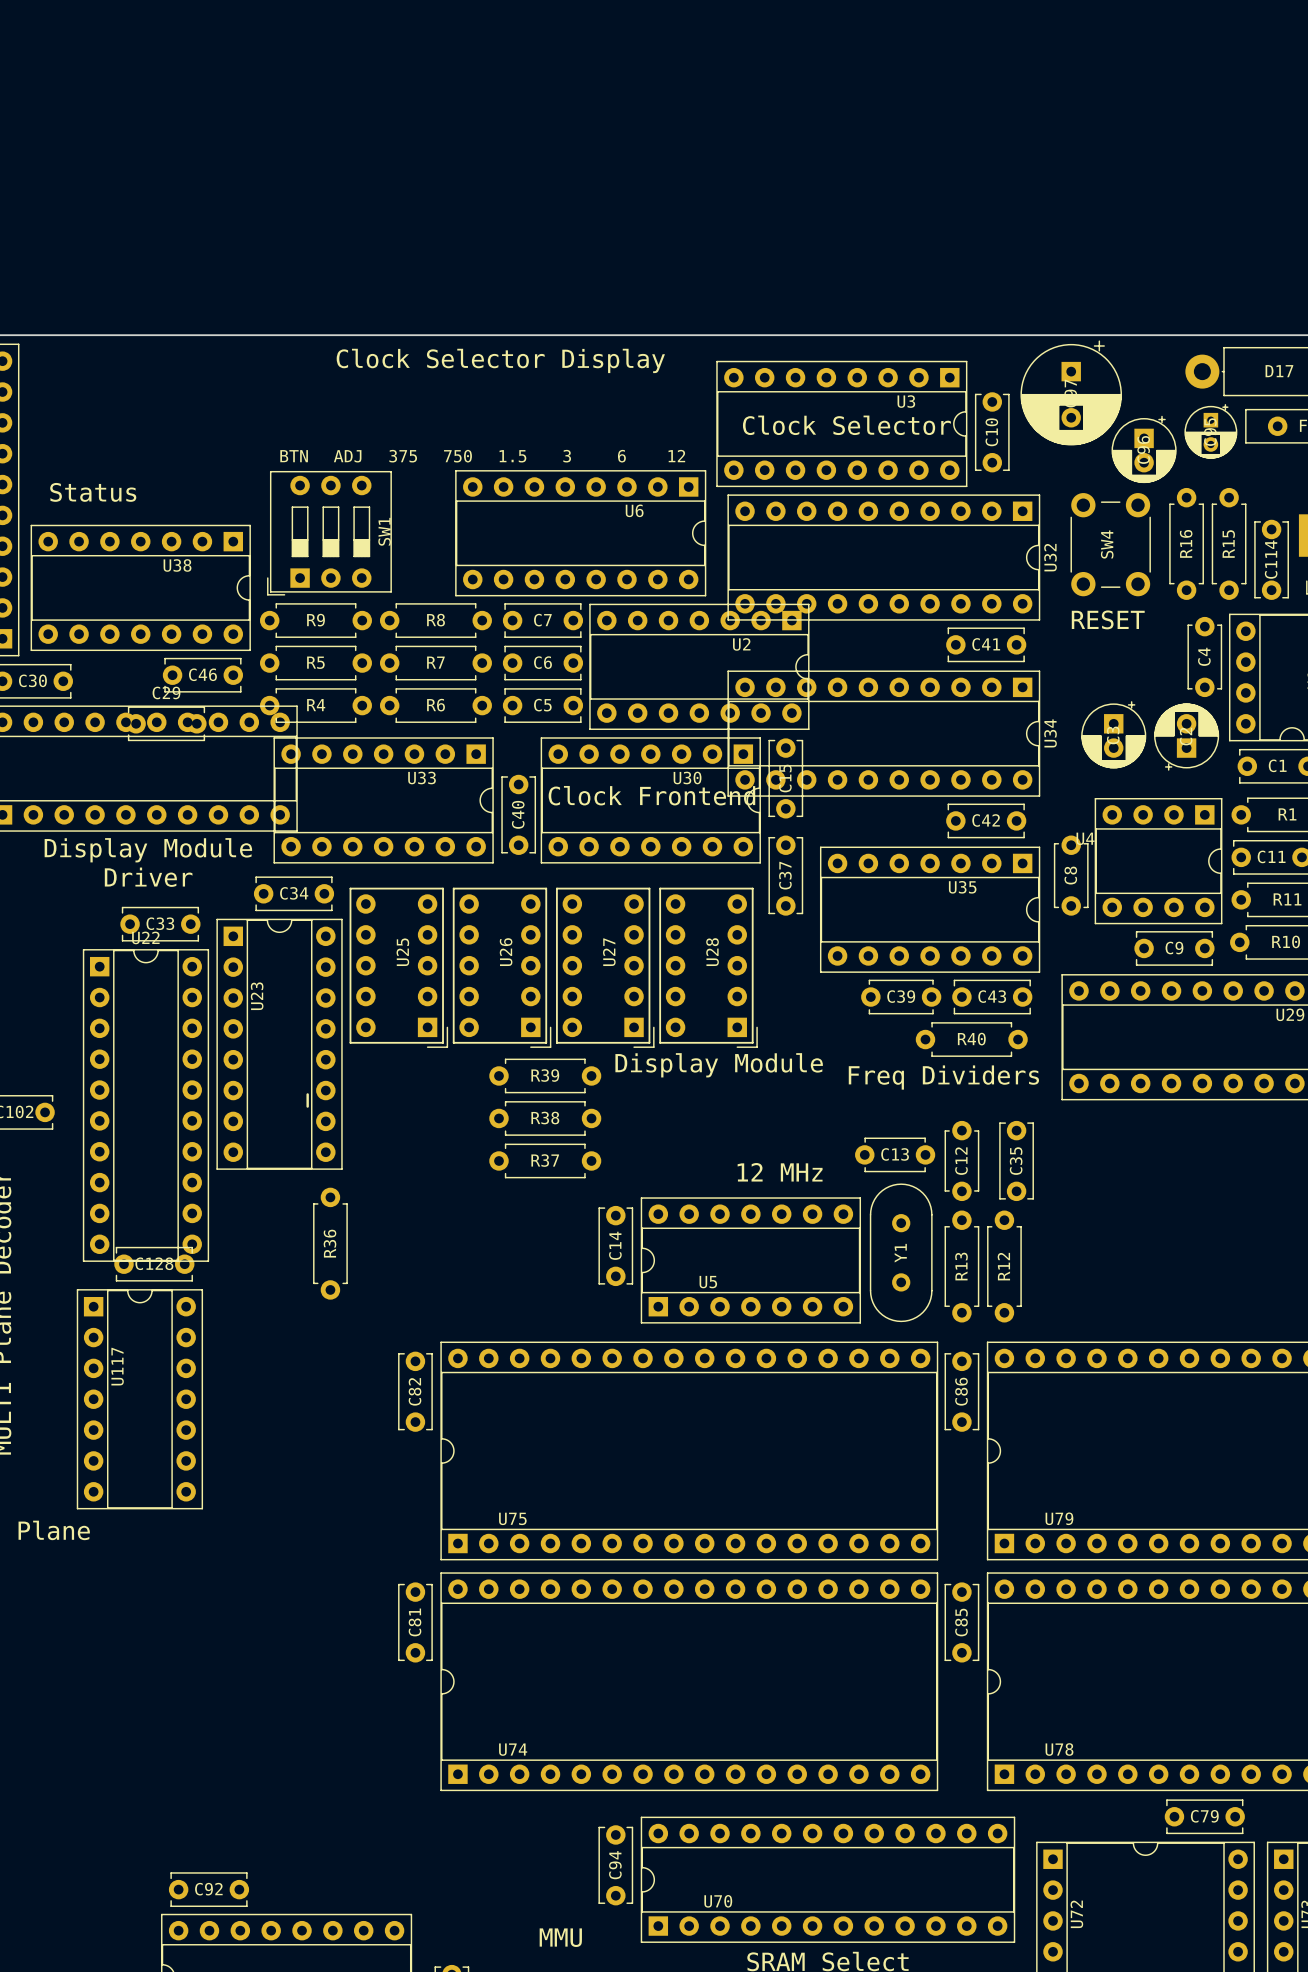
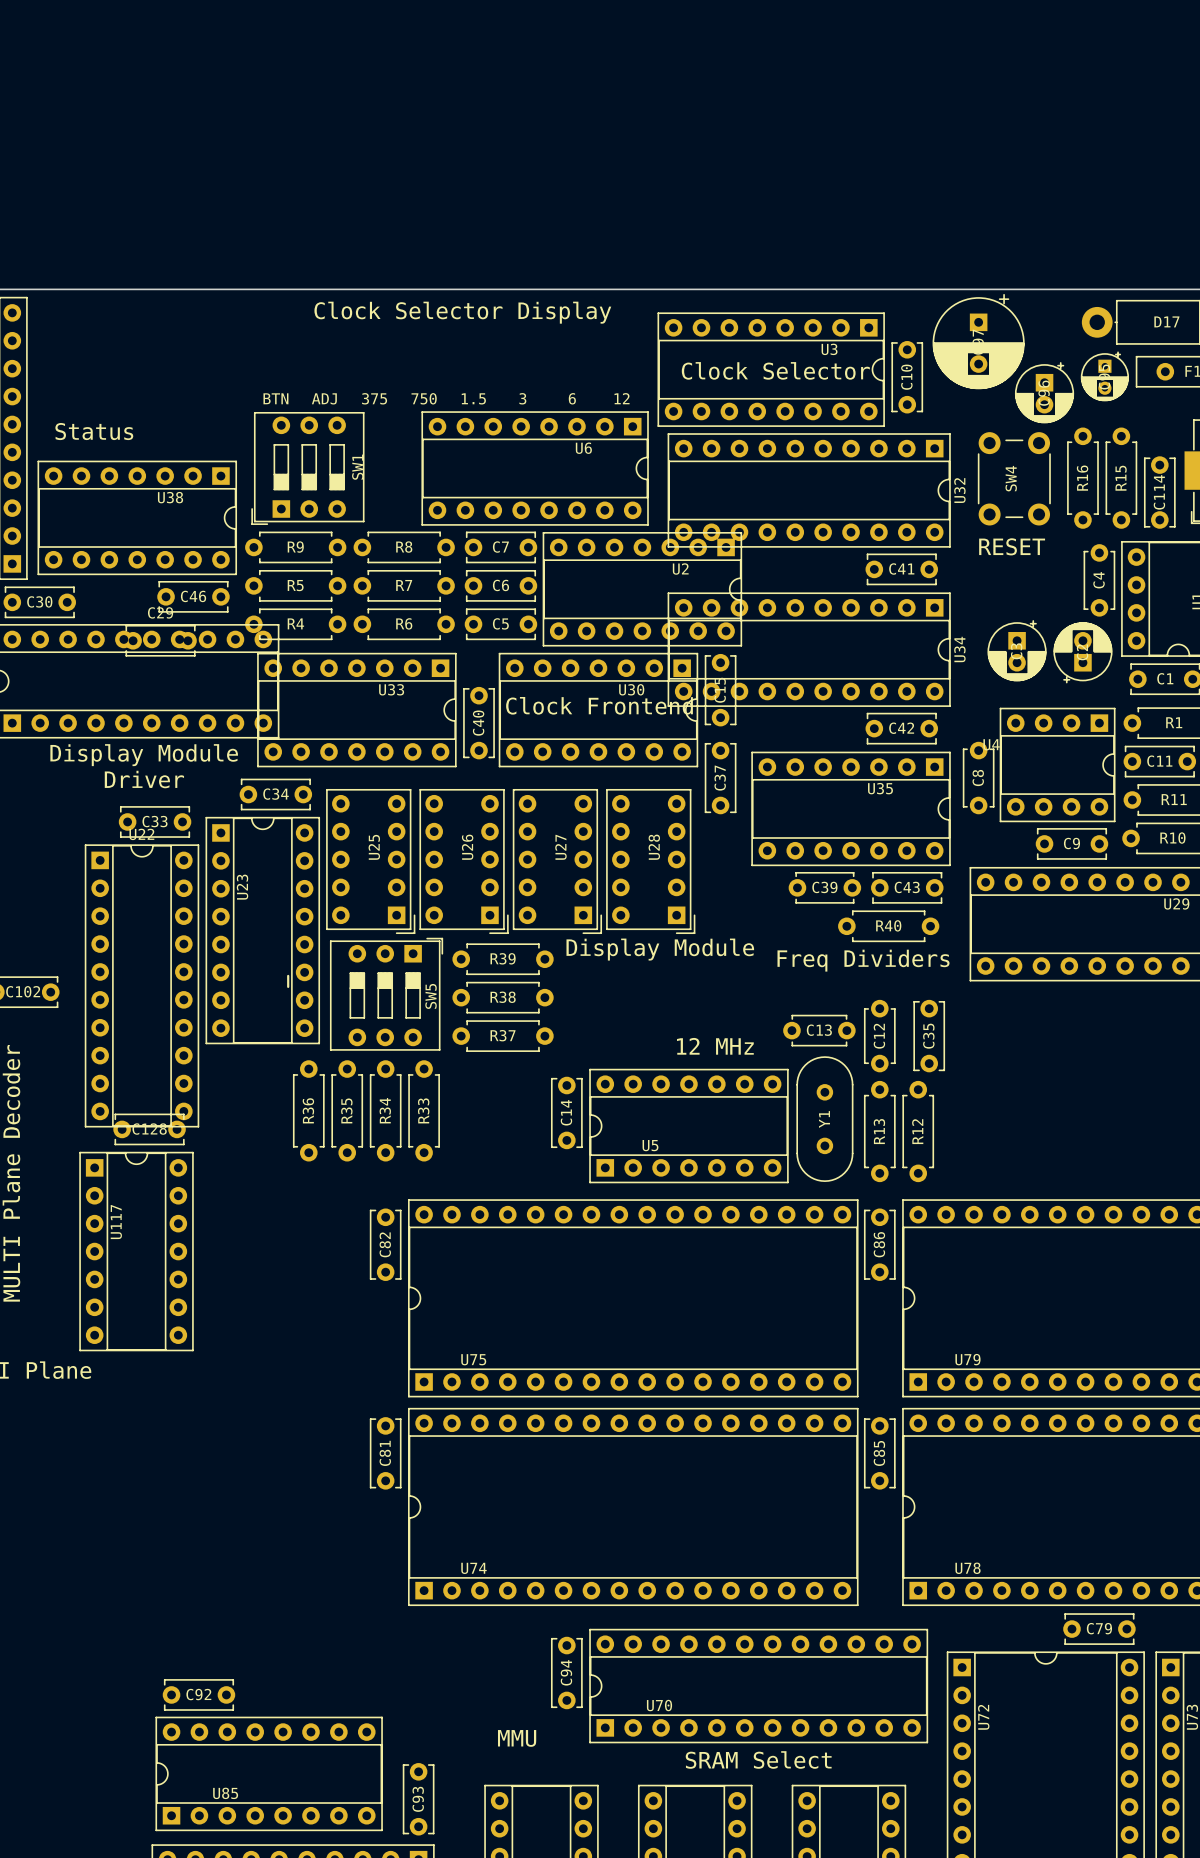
SW5: none -> (386, 994)
R35: none -> (347, 1110)
R34: none -> (385, 1110)
R33: none -> (424, 1110)

